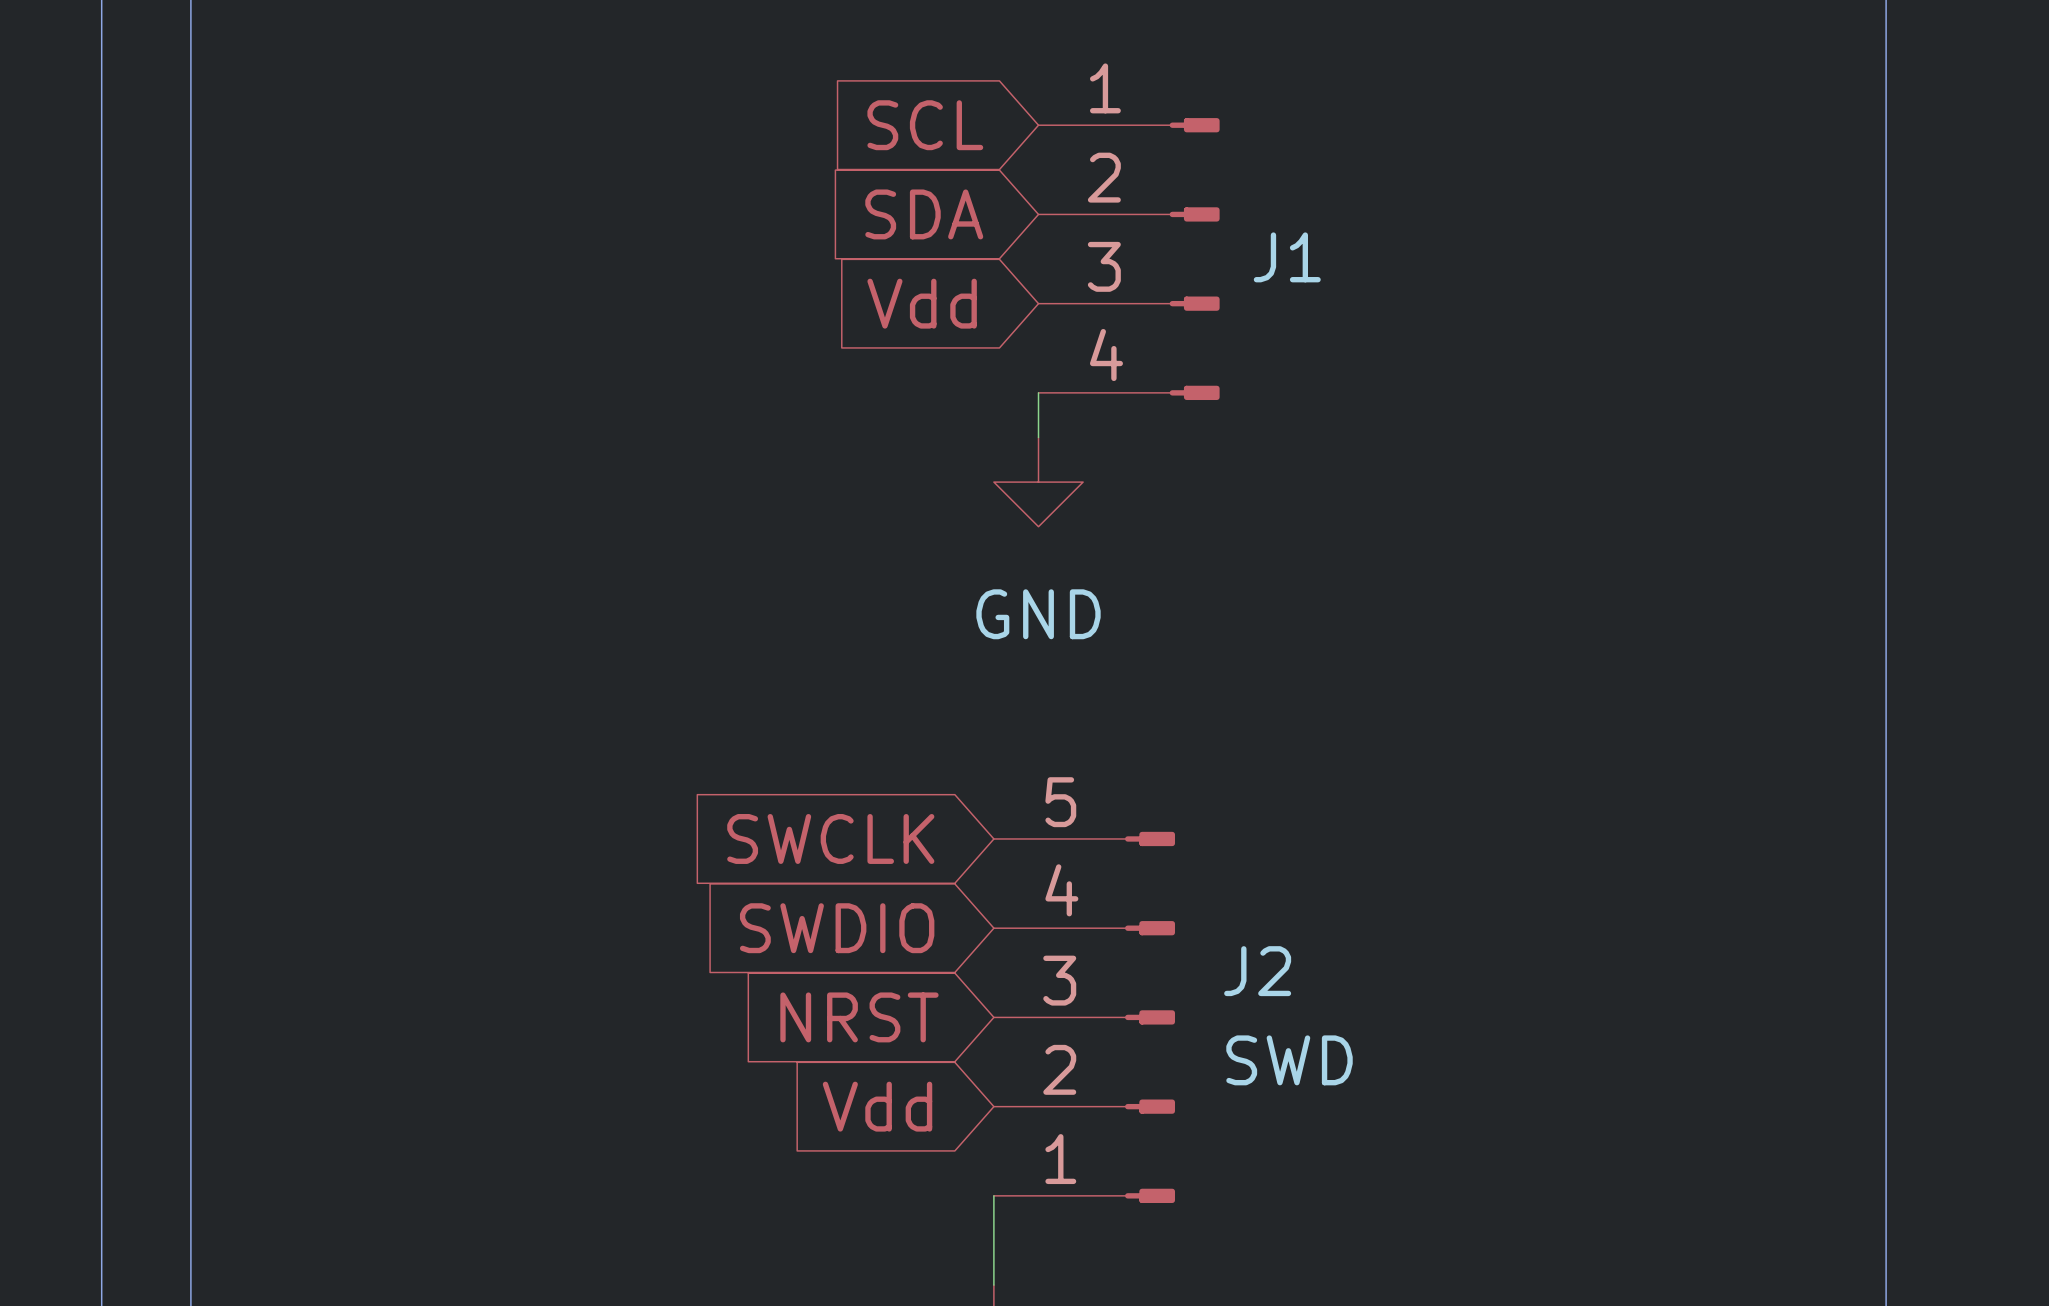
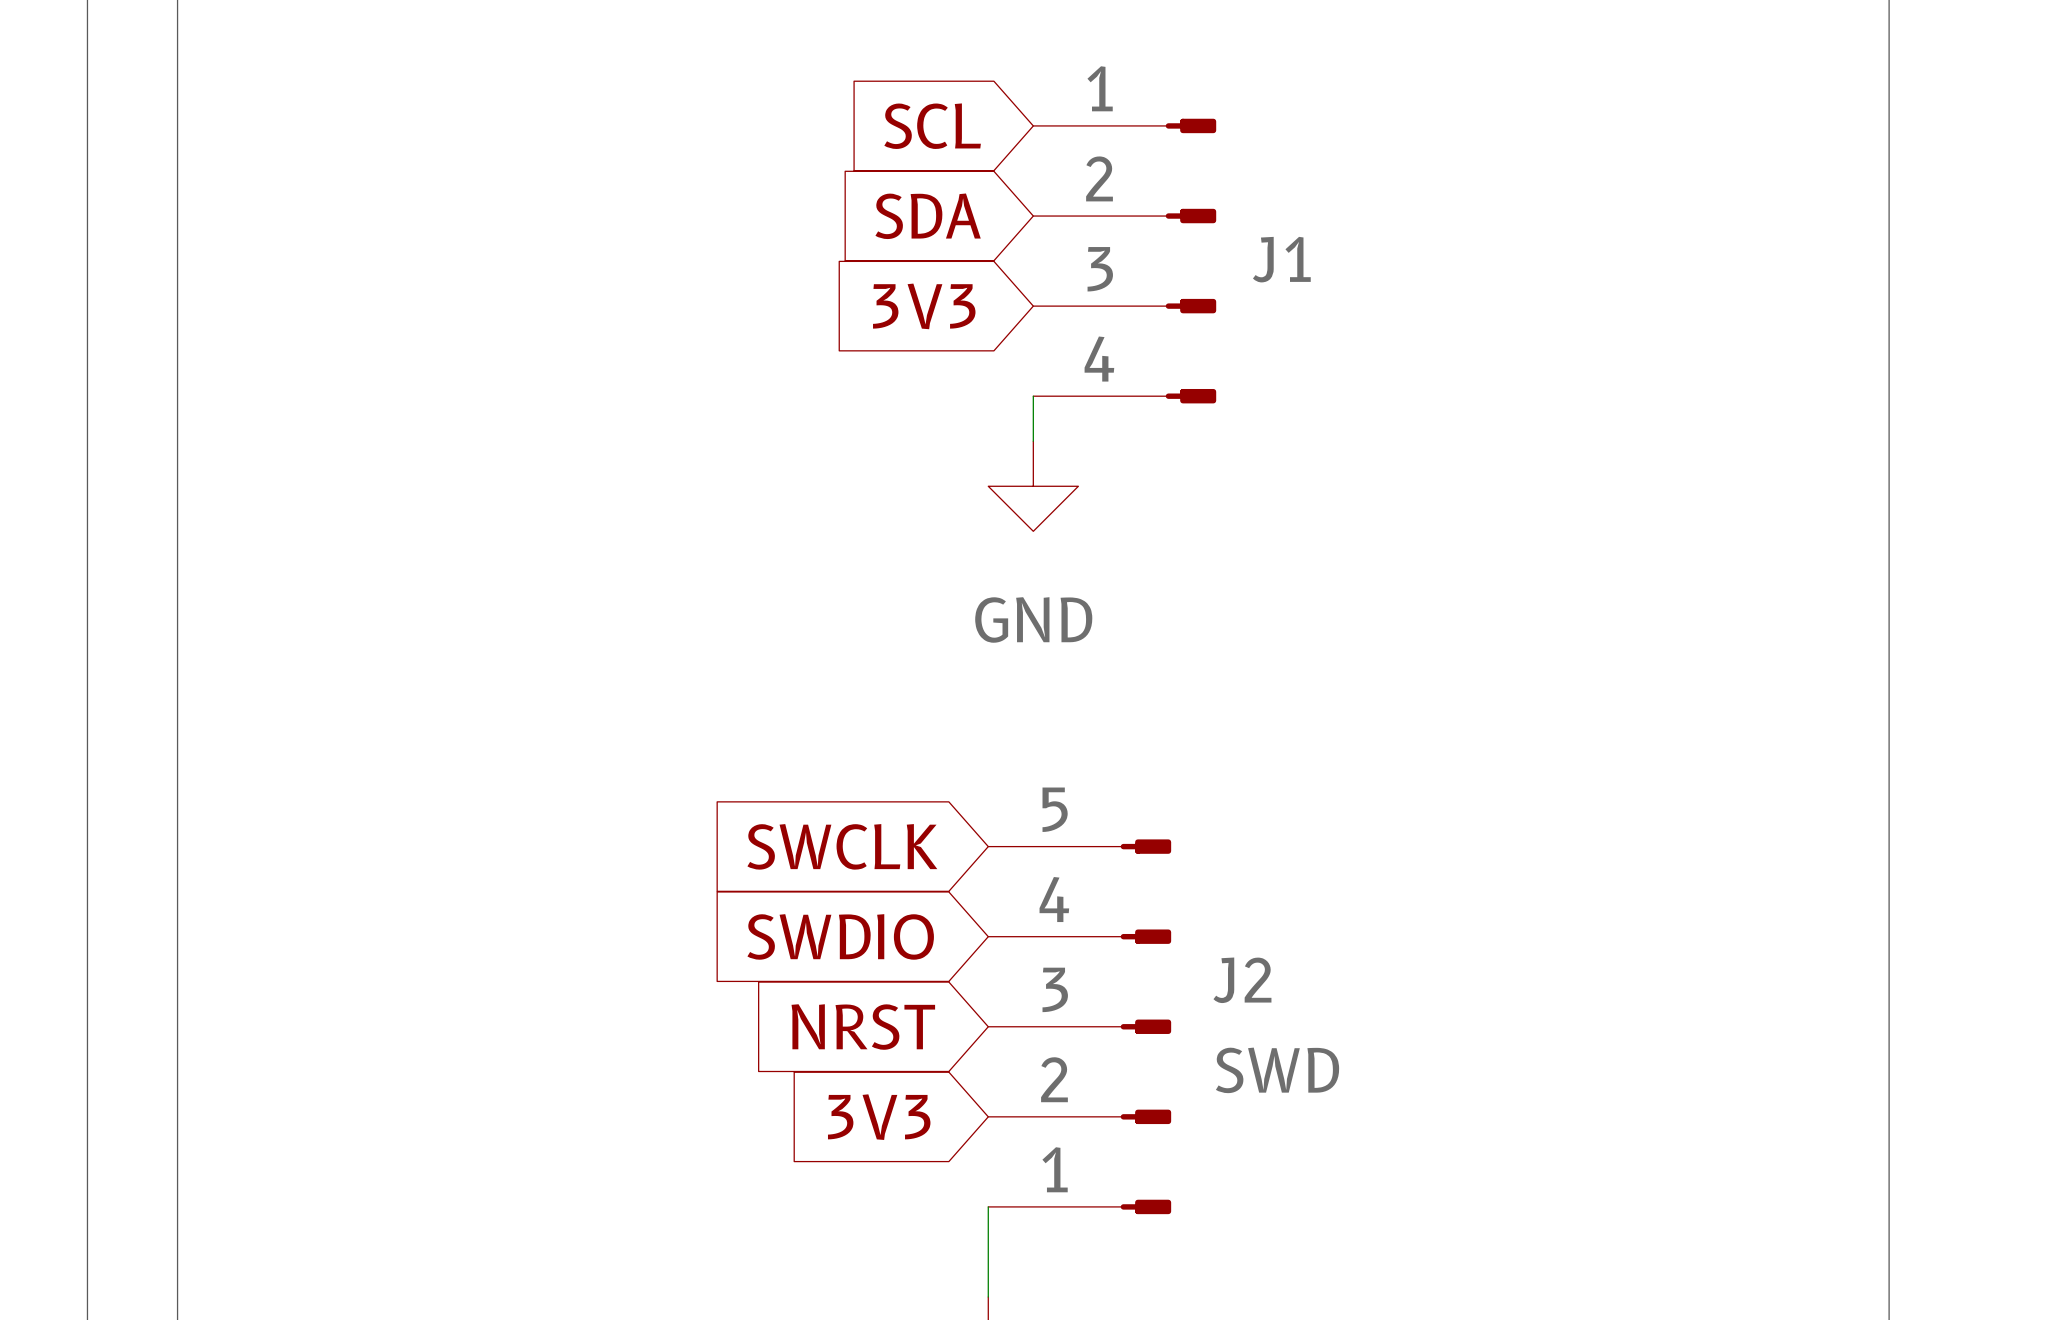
global label: Vdd (922, 303) -> 3V3 (924, 306)
global label: Vdd (877, 1106) -> 3V3 (879, 1117)

